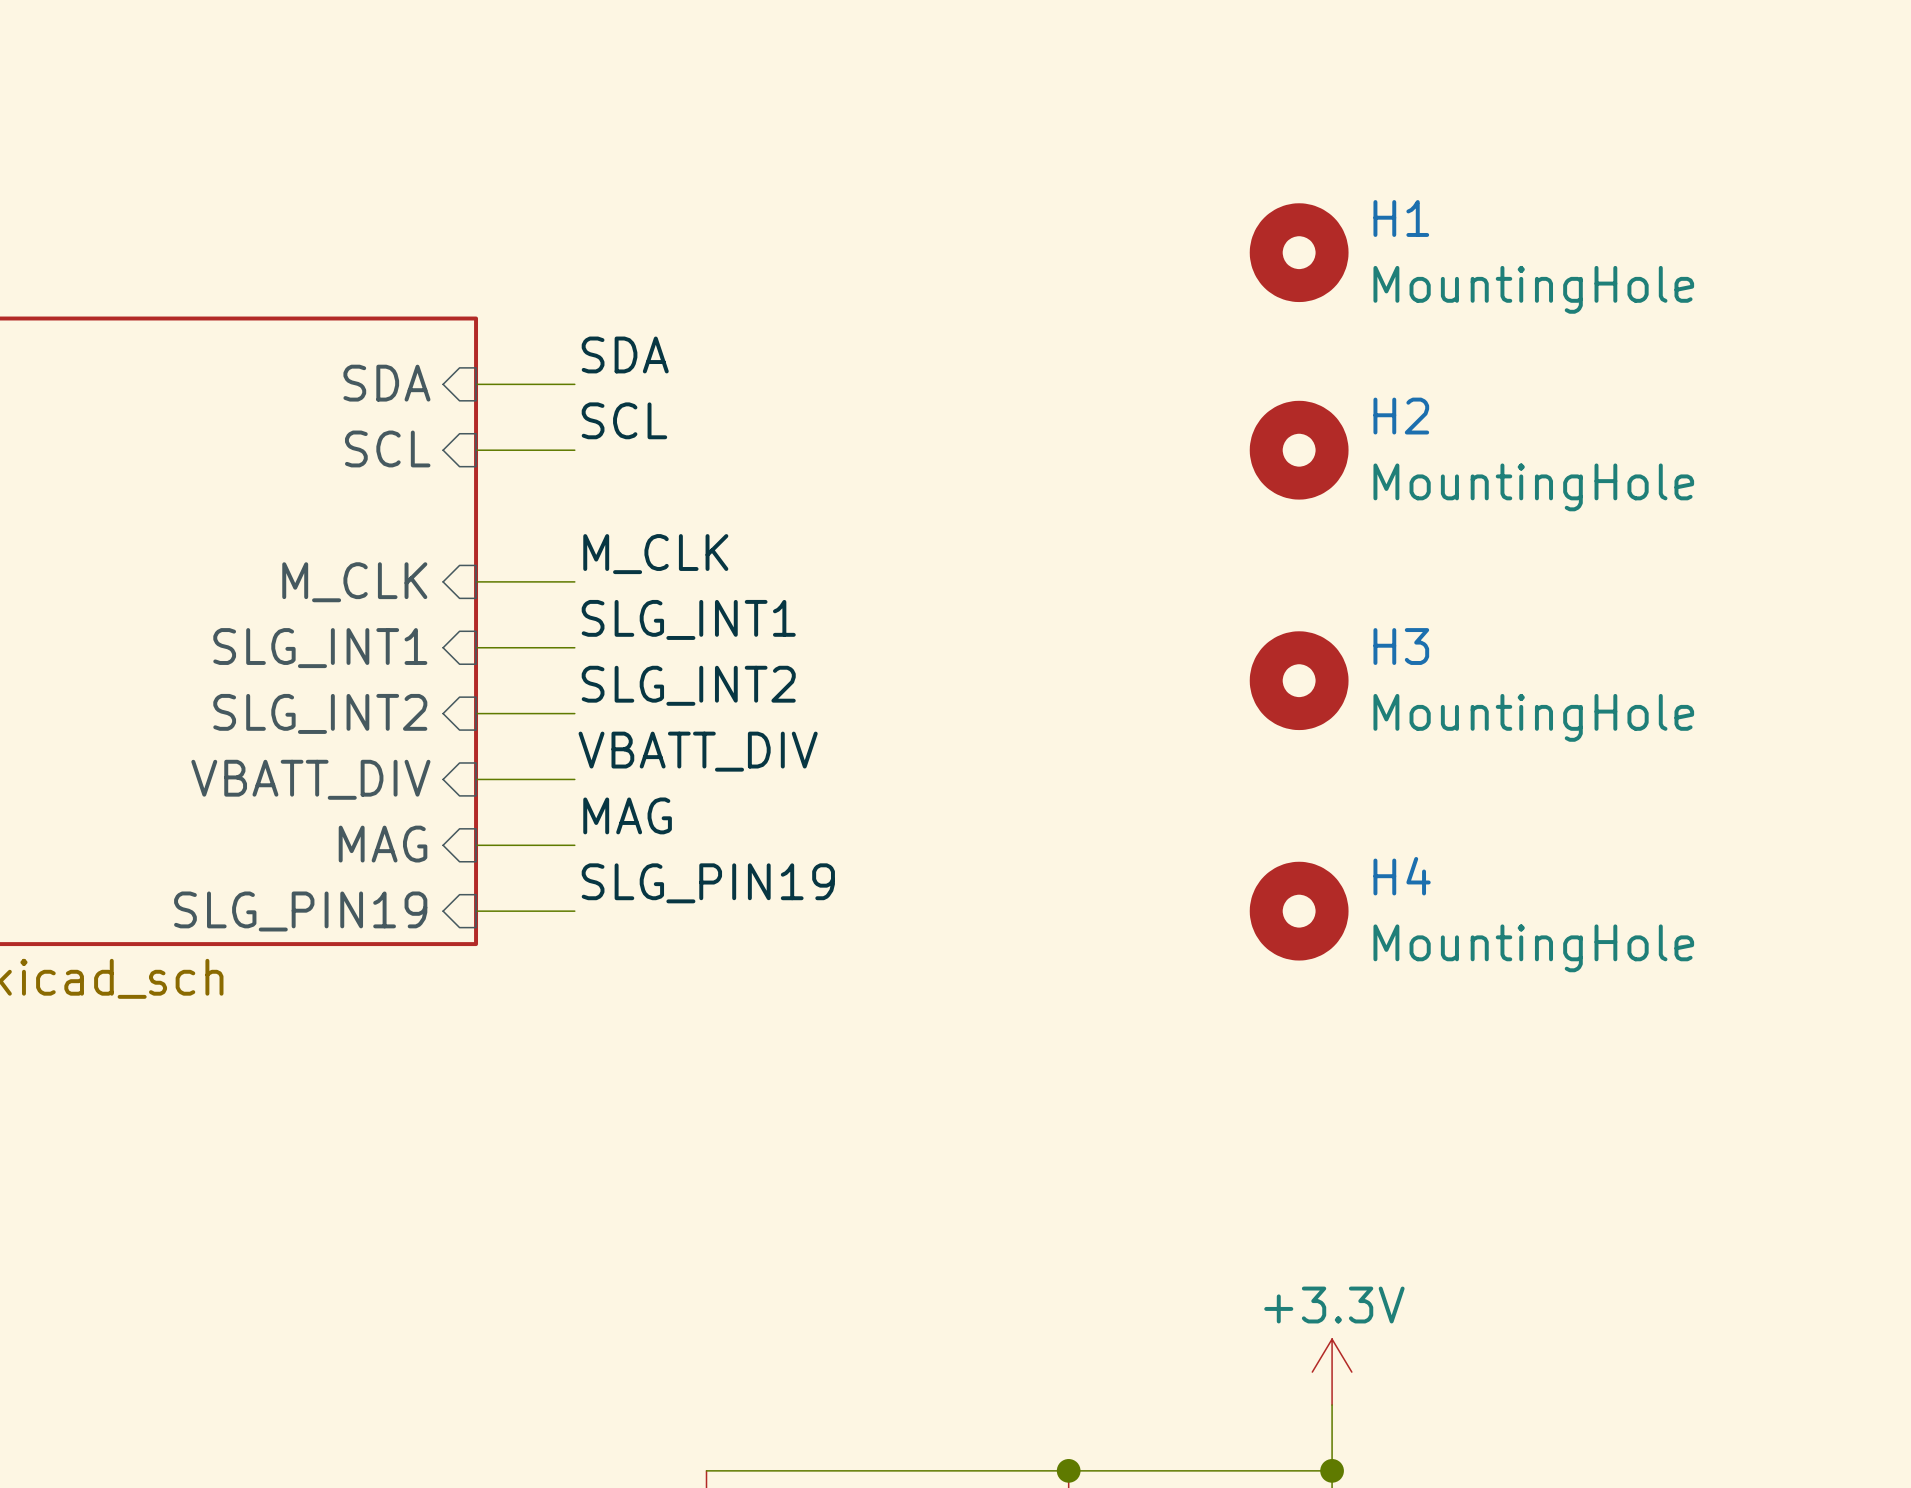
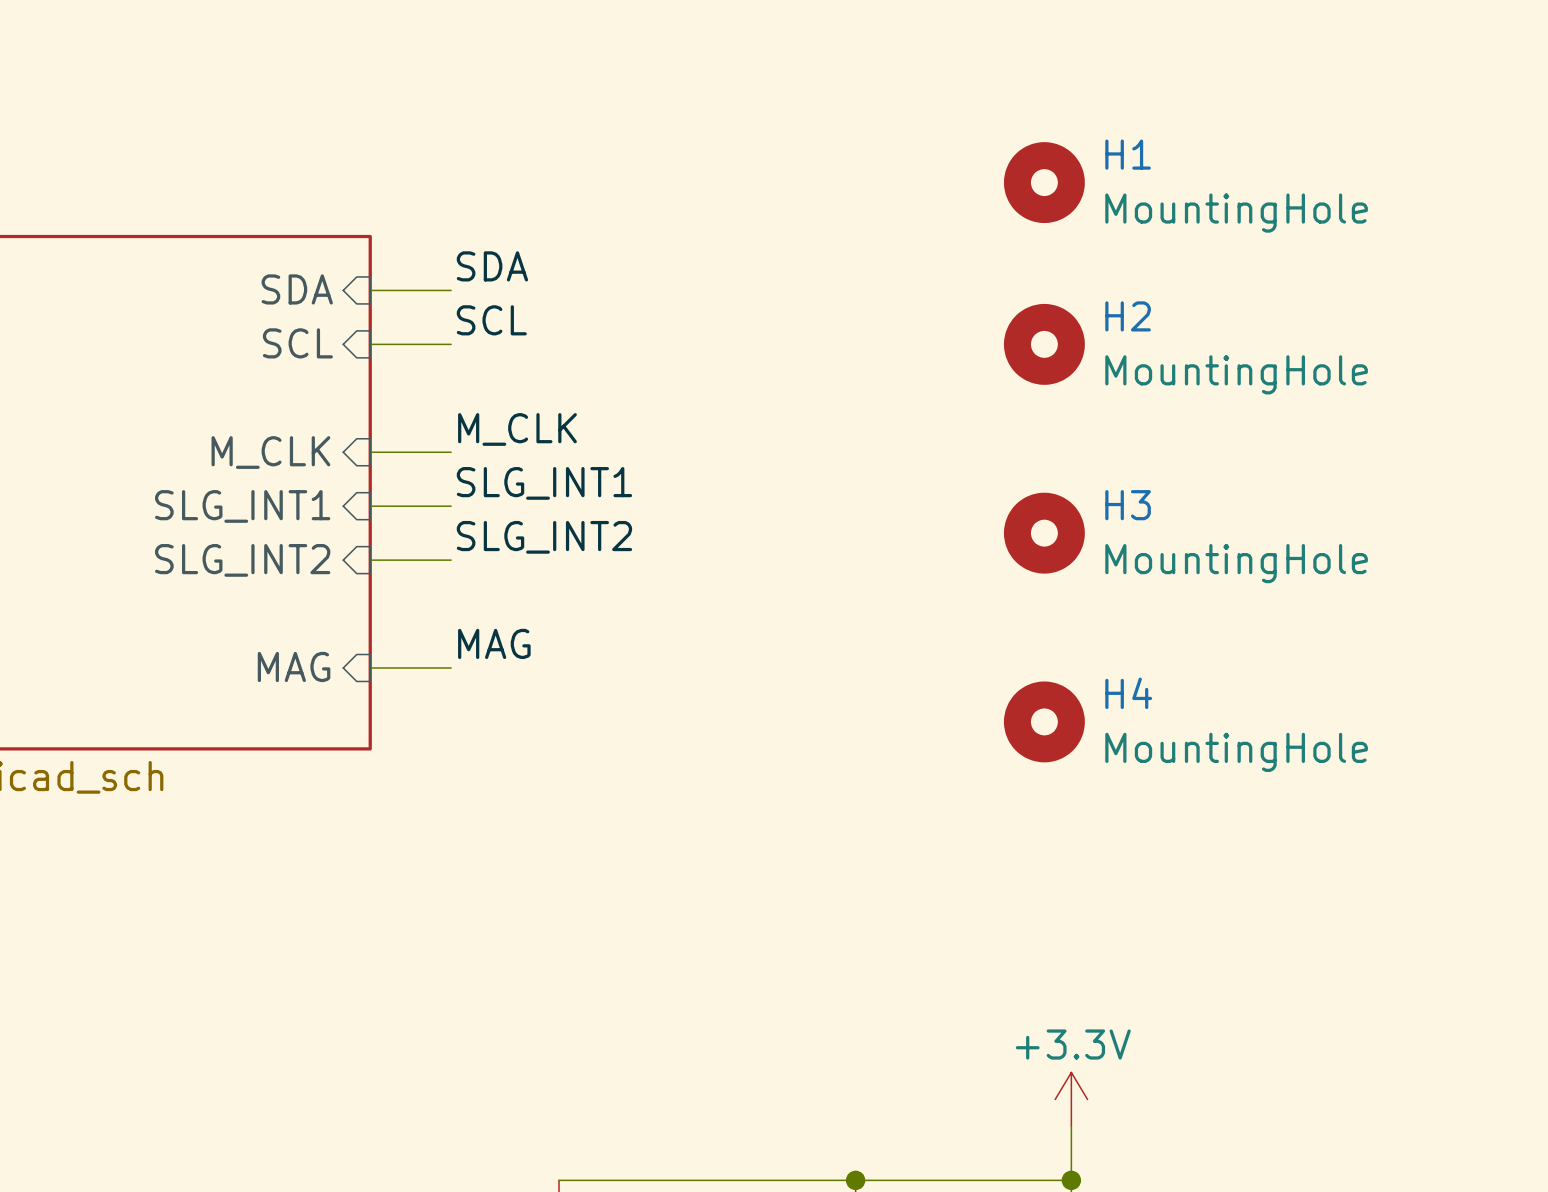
label: VBATT_DIV (698, 751) -> none
sheet pin: VBATT_DIV (310, 779) -> none
wire: (476, 779) (574, 779) -> none
label: SLG_PIN19 (708, 883) -> none
sheet pin: SLG_PIN19 (300, 911) -> none
wire: (476, 911) (574, 911) -> none

